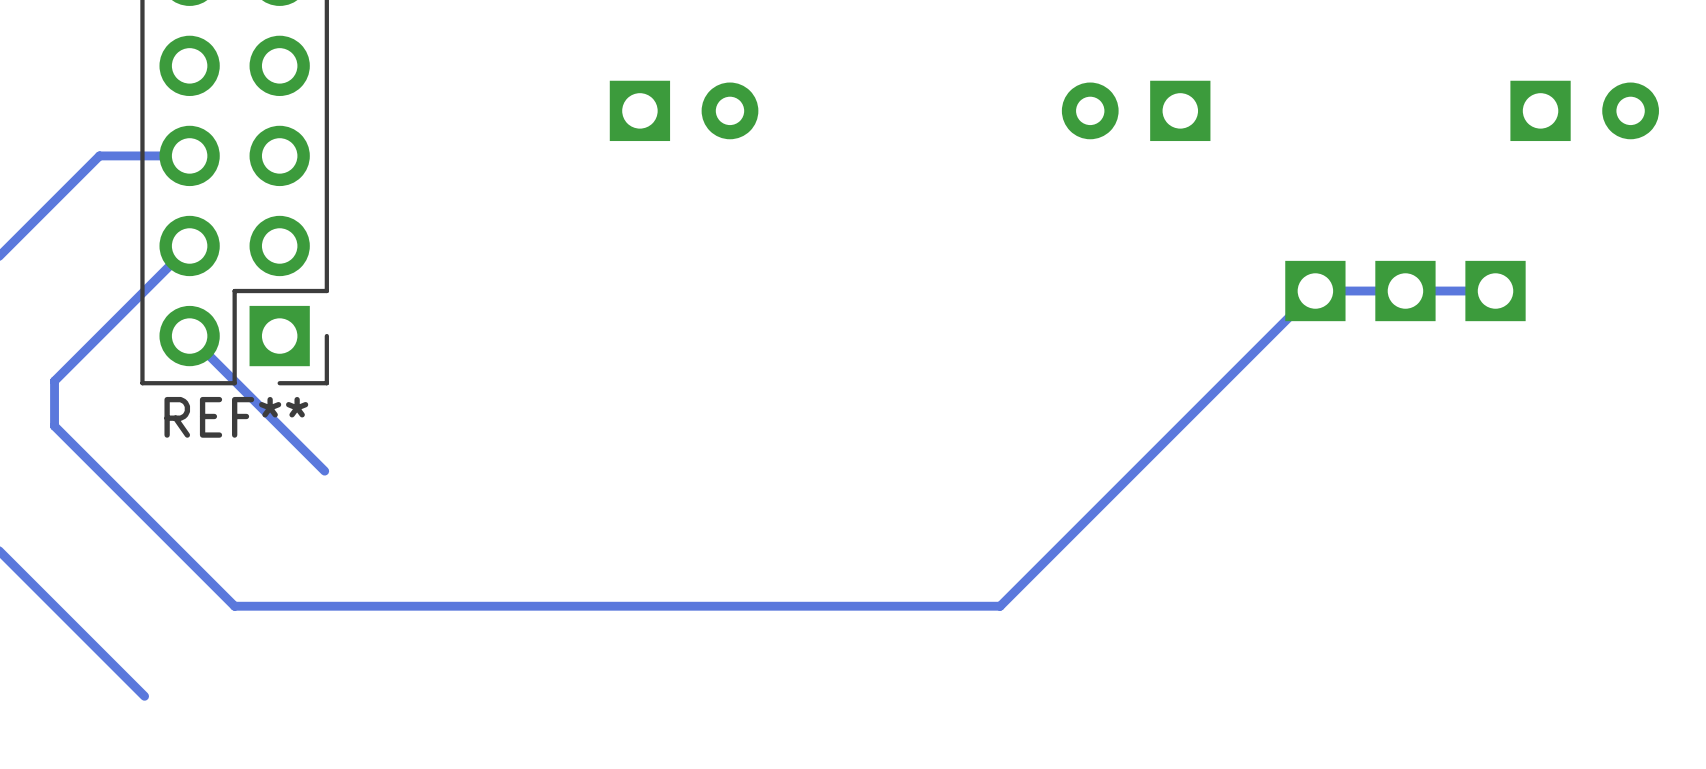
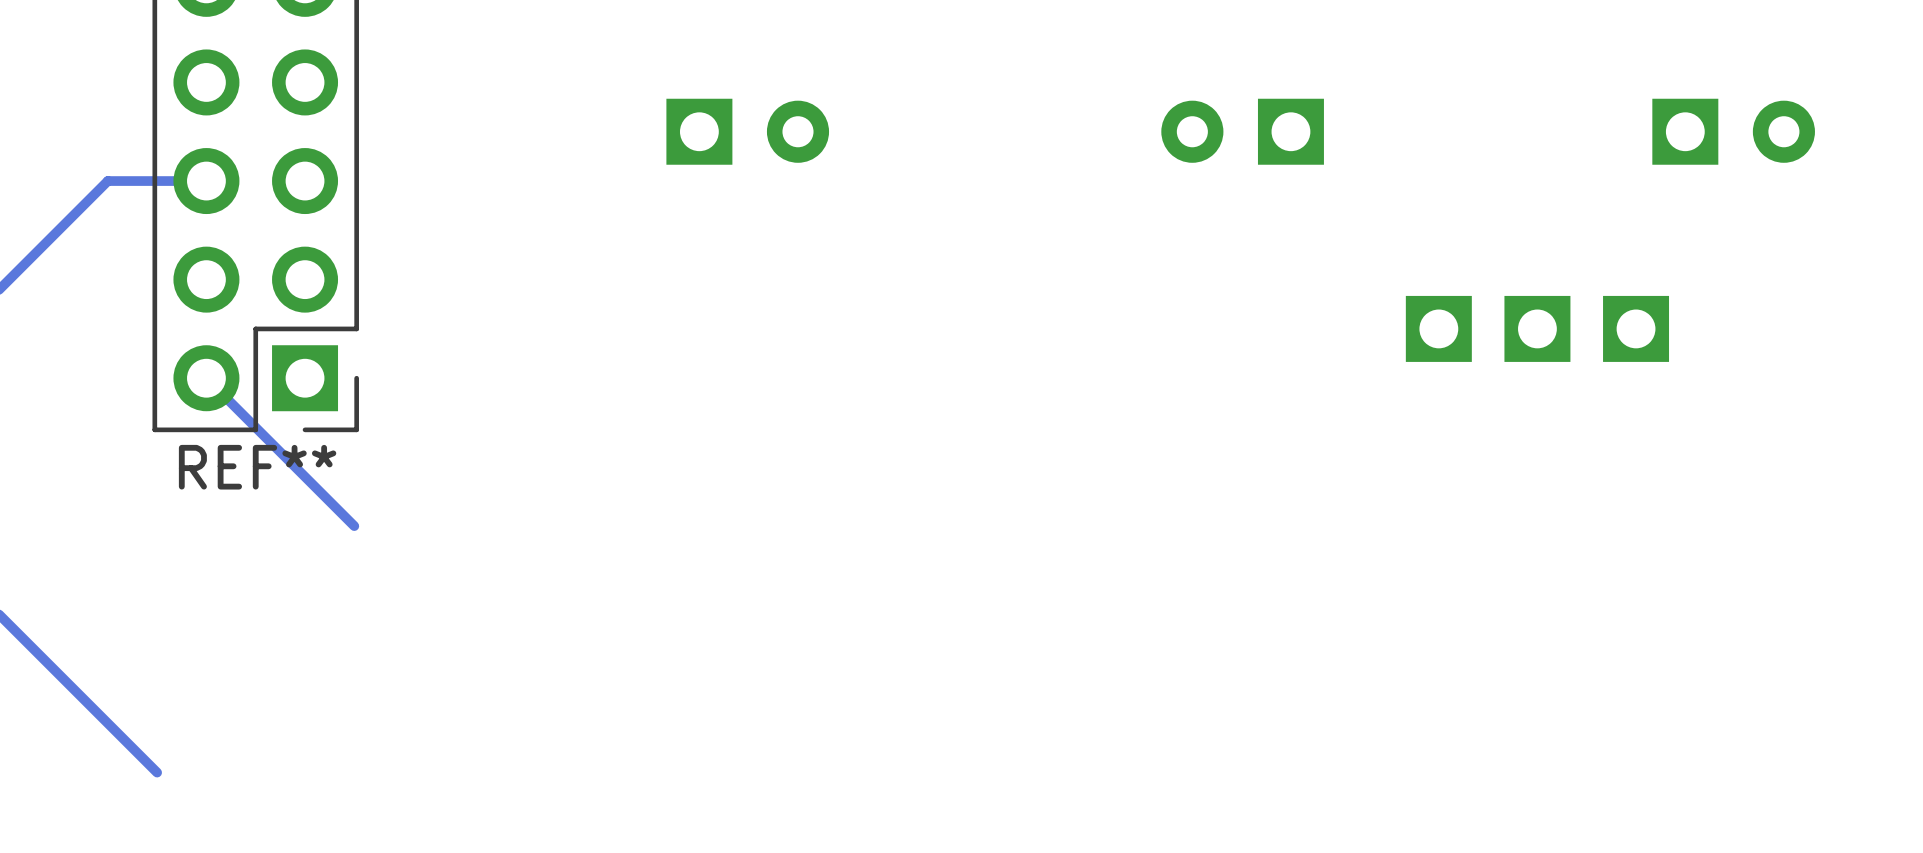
track: (189, 245) (54, 381) (54, 426) (234, 606) (1000, 606) (1315, 291) (1495, 291) -> none

